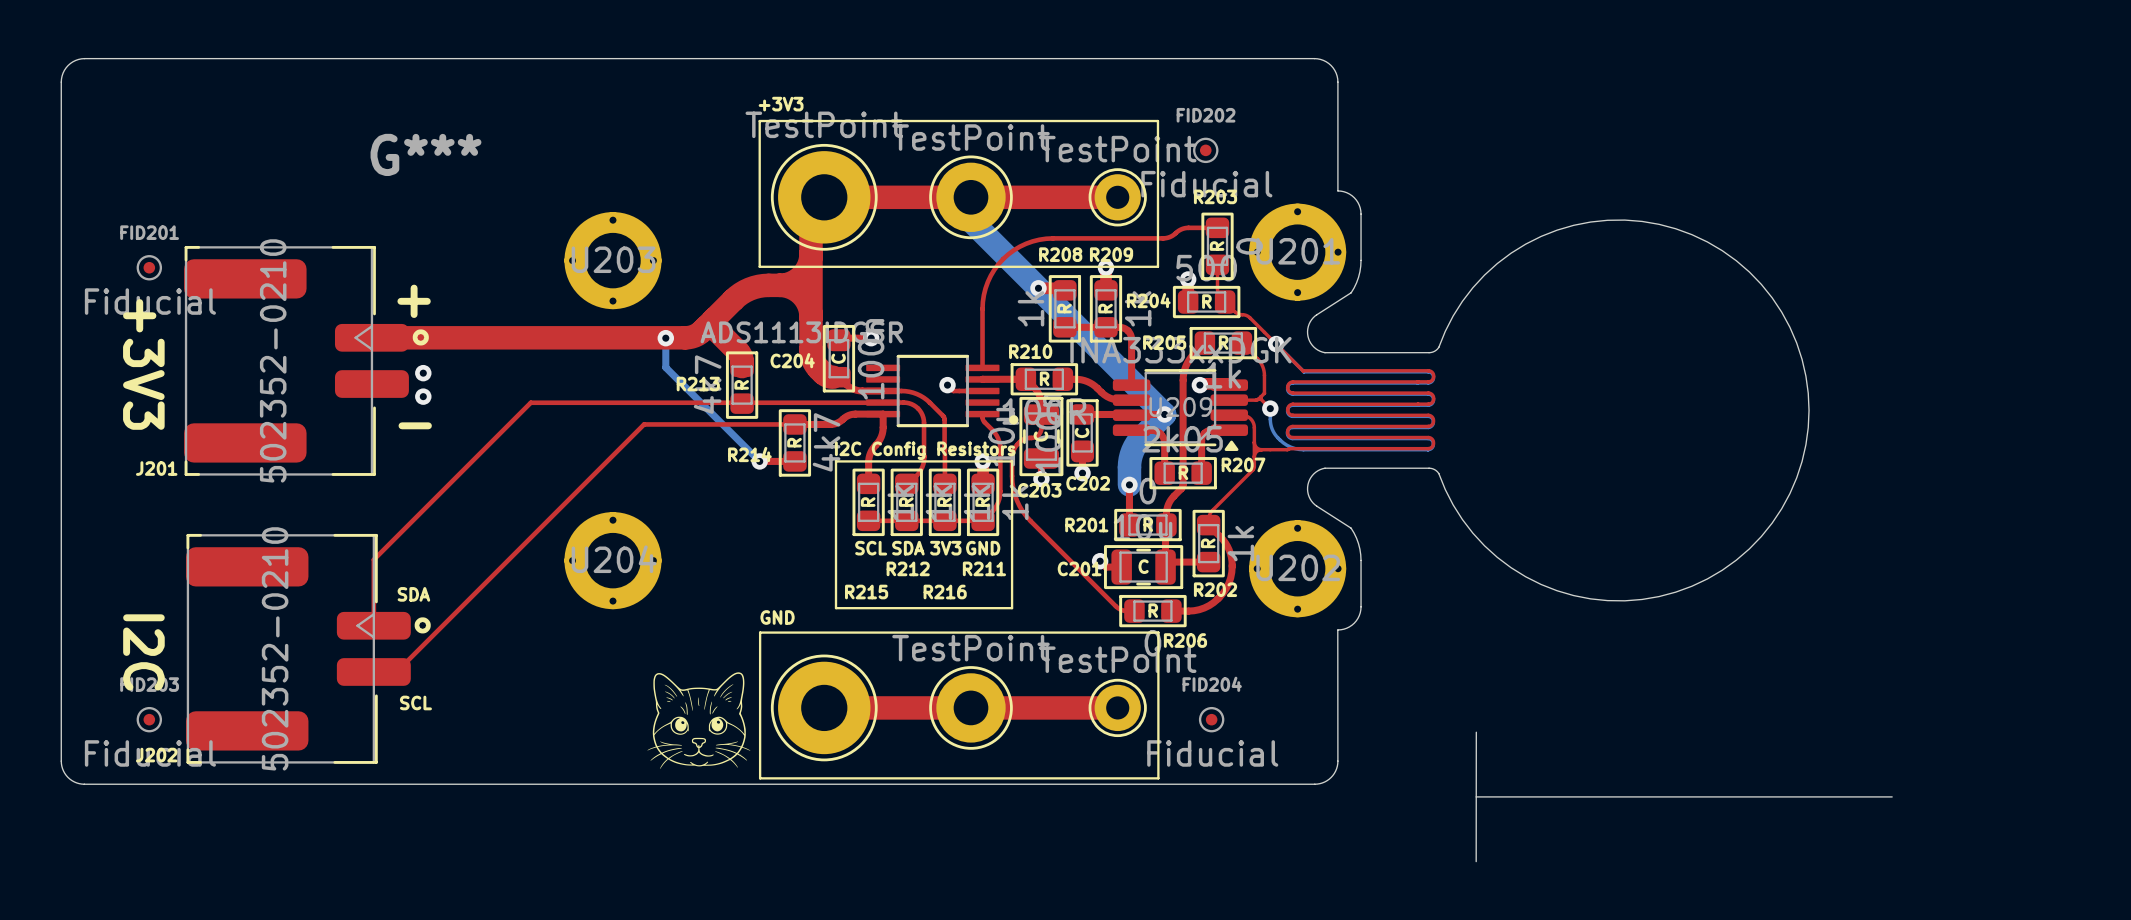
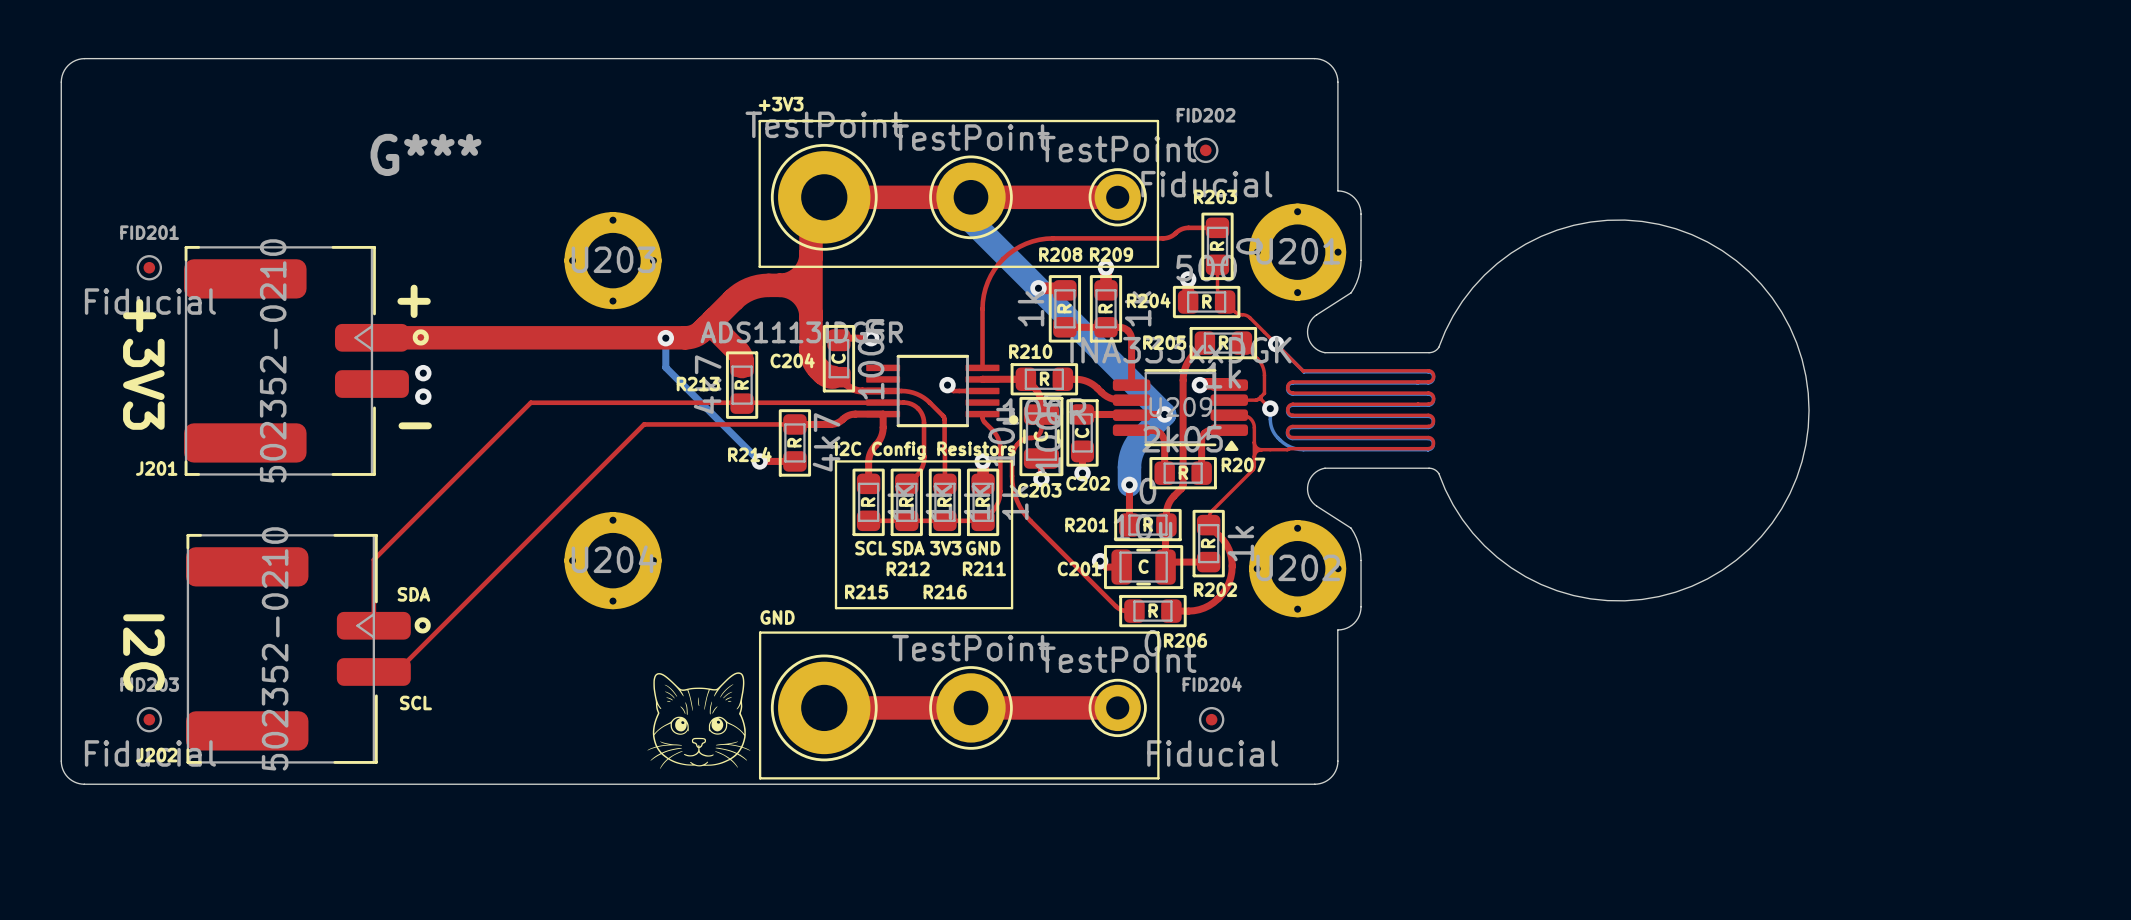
board edge: (1476, 732) (1476, 861) -> none
board edge: (1476, 796) (1892, 796) -> none

